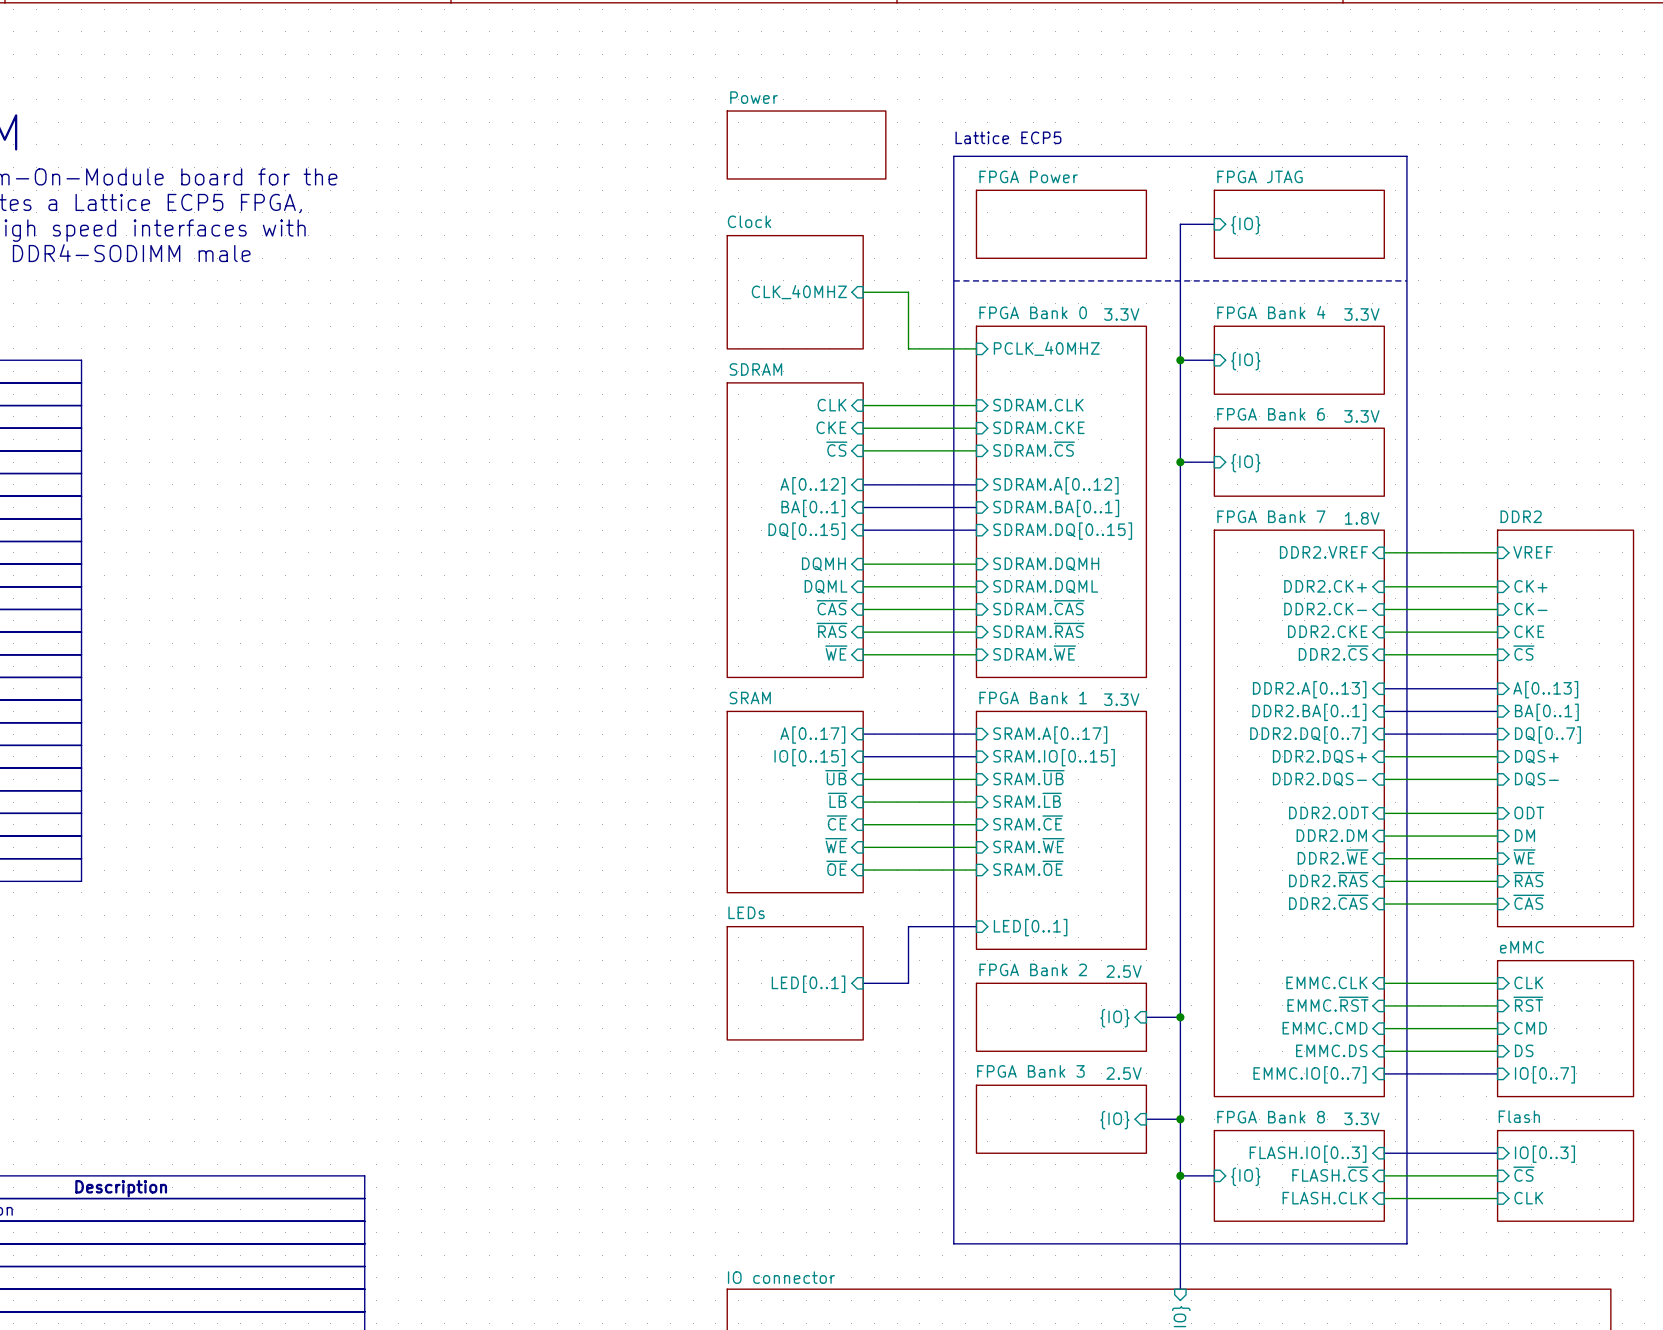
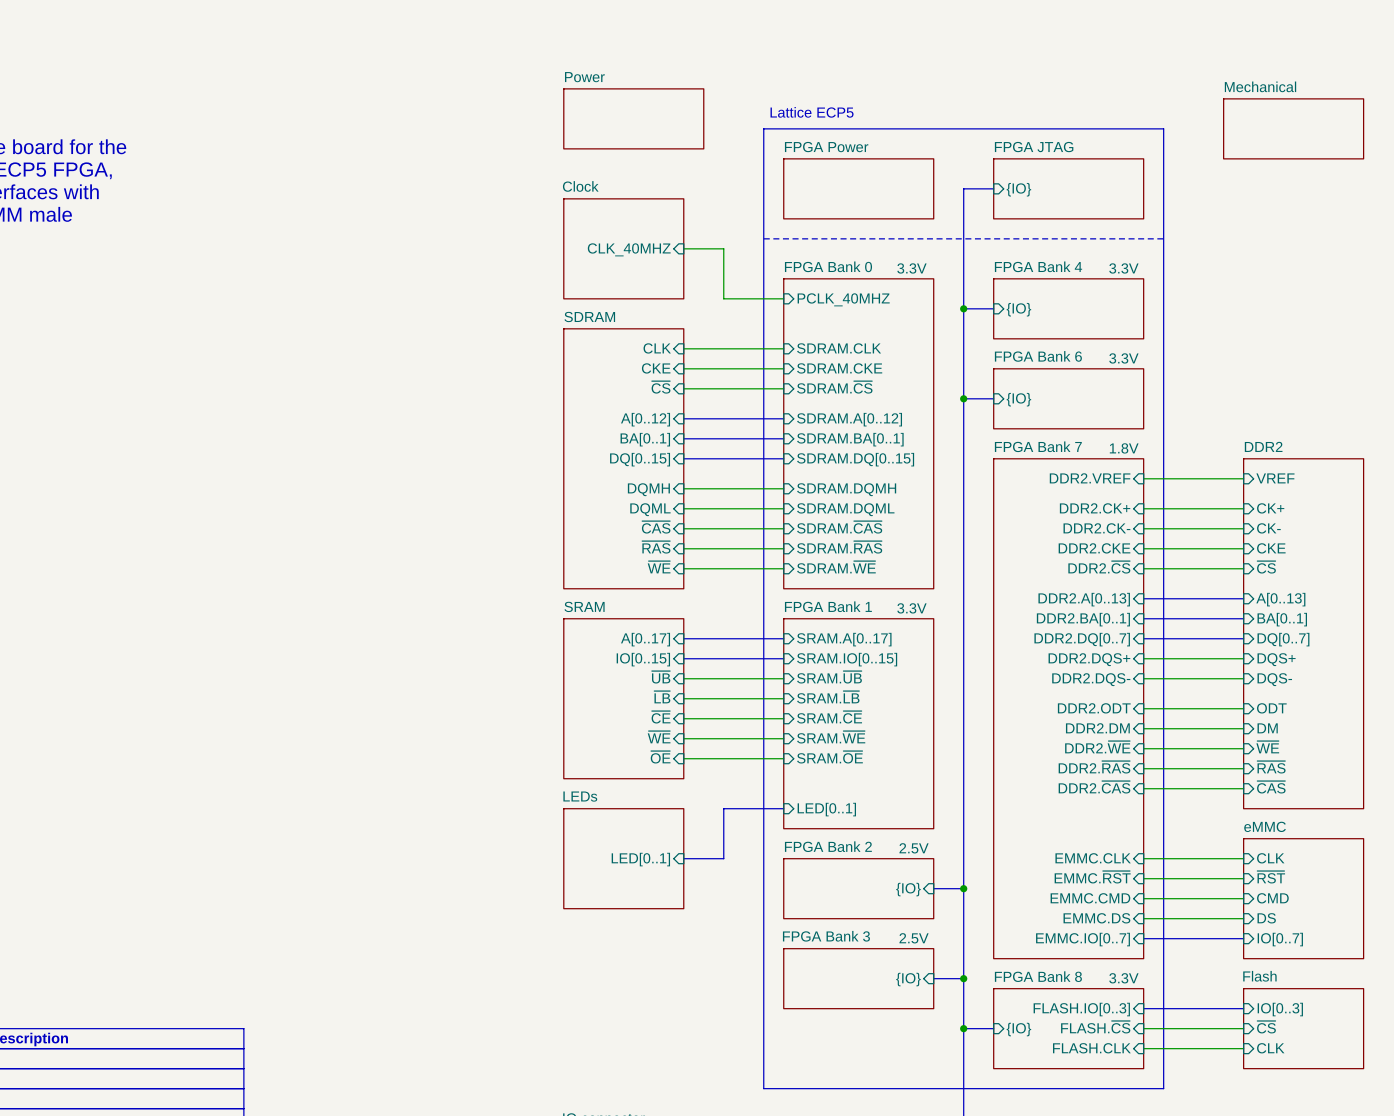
sheet Mechanical: none -> (1293, 128)

